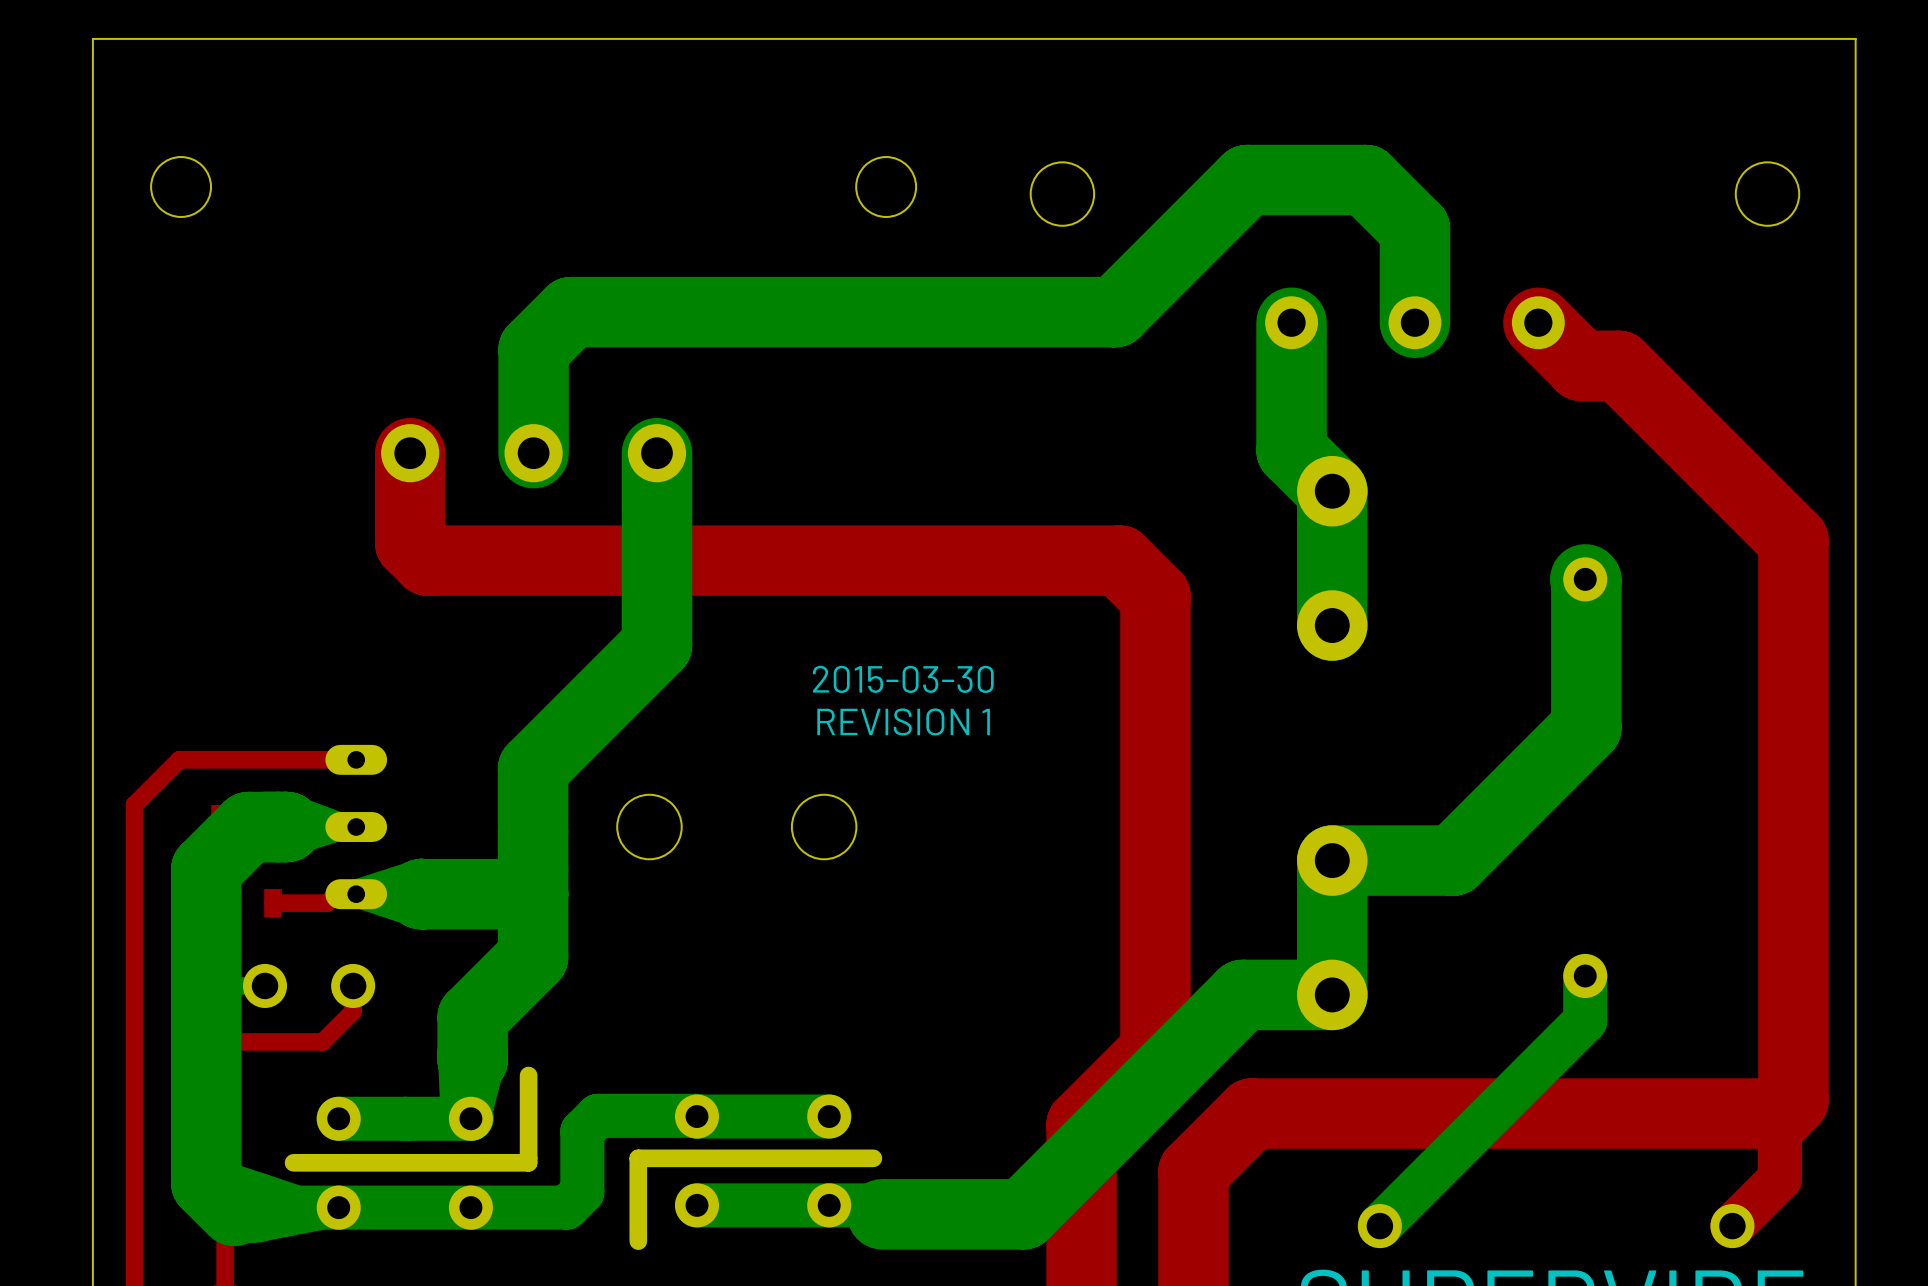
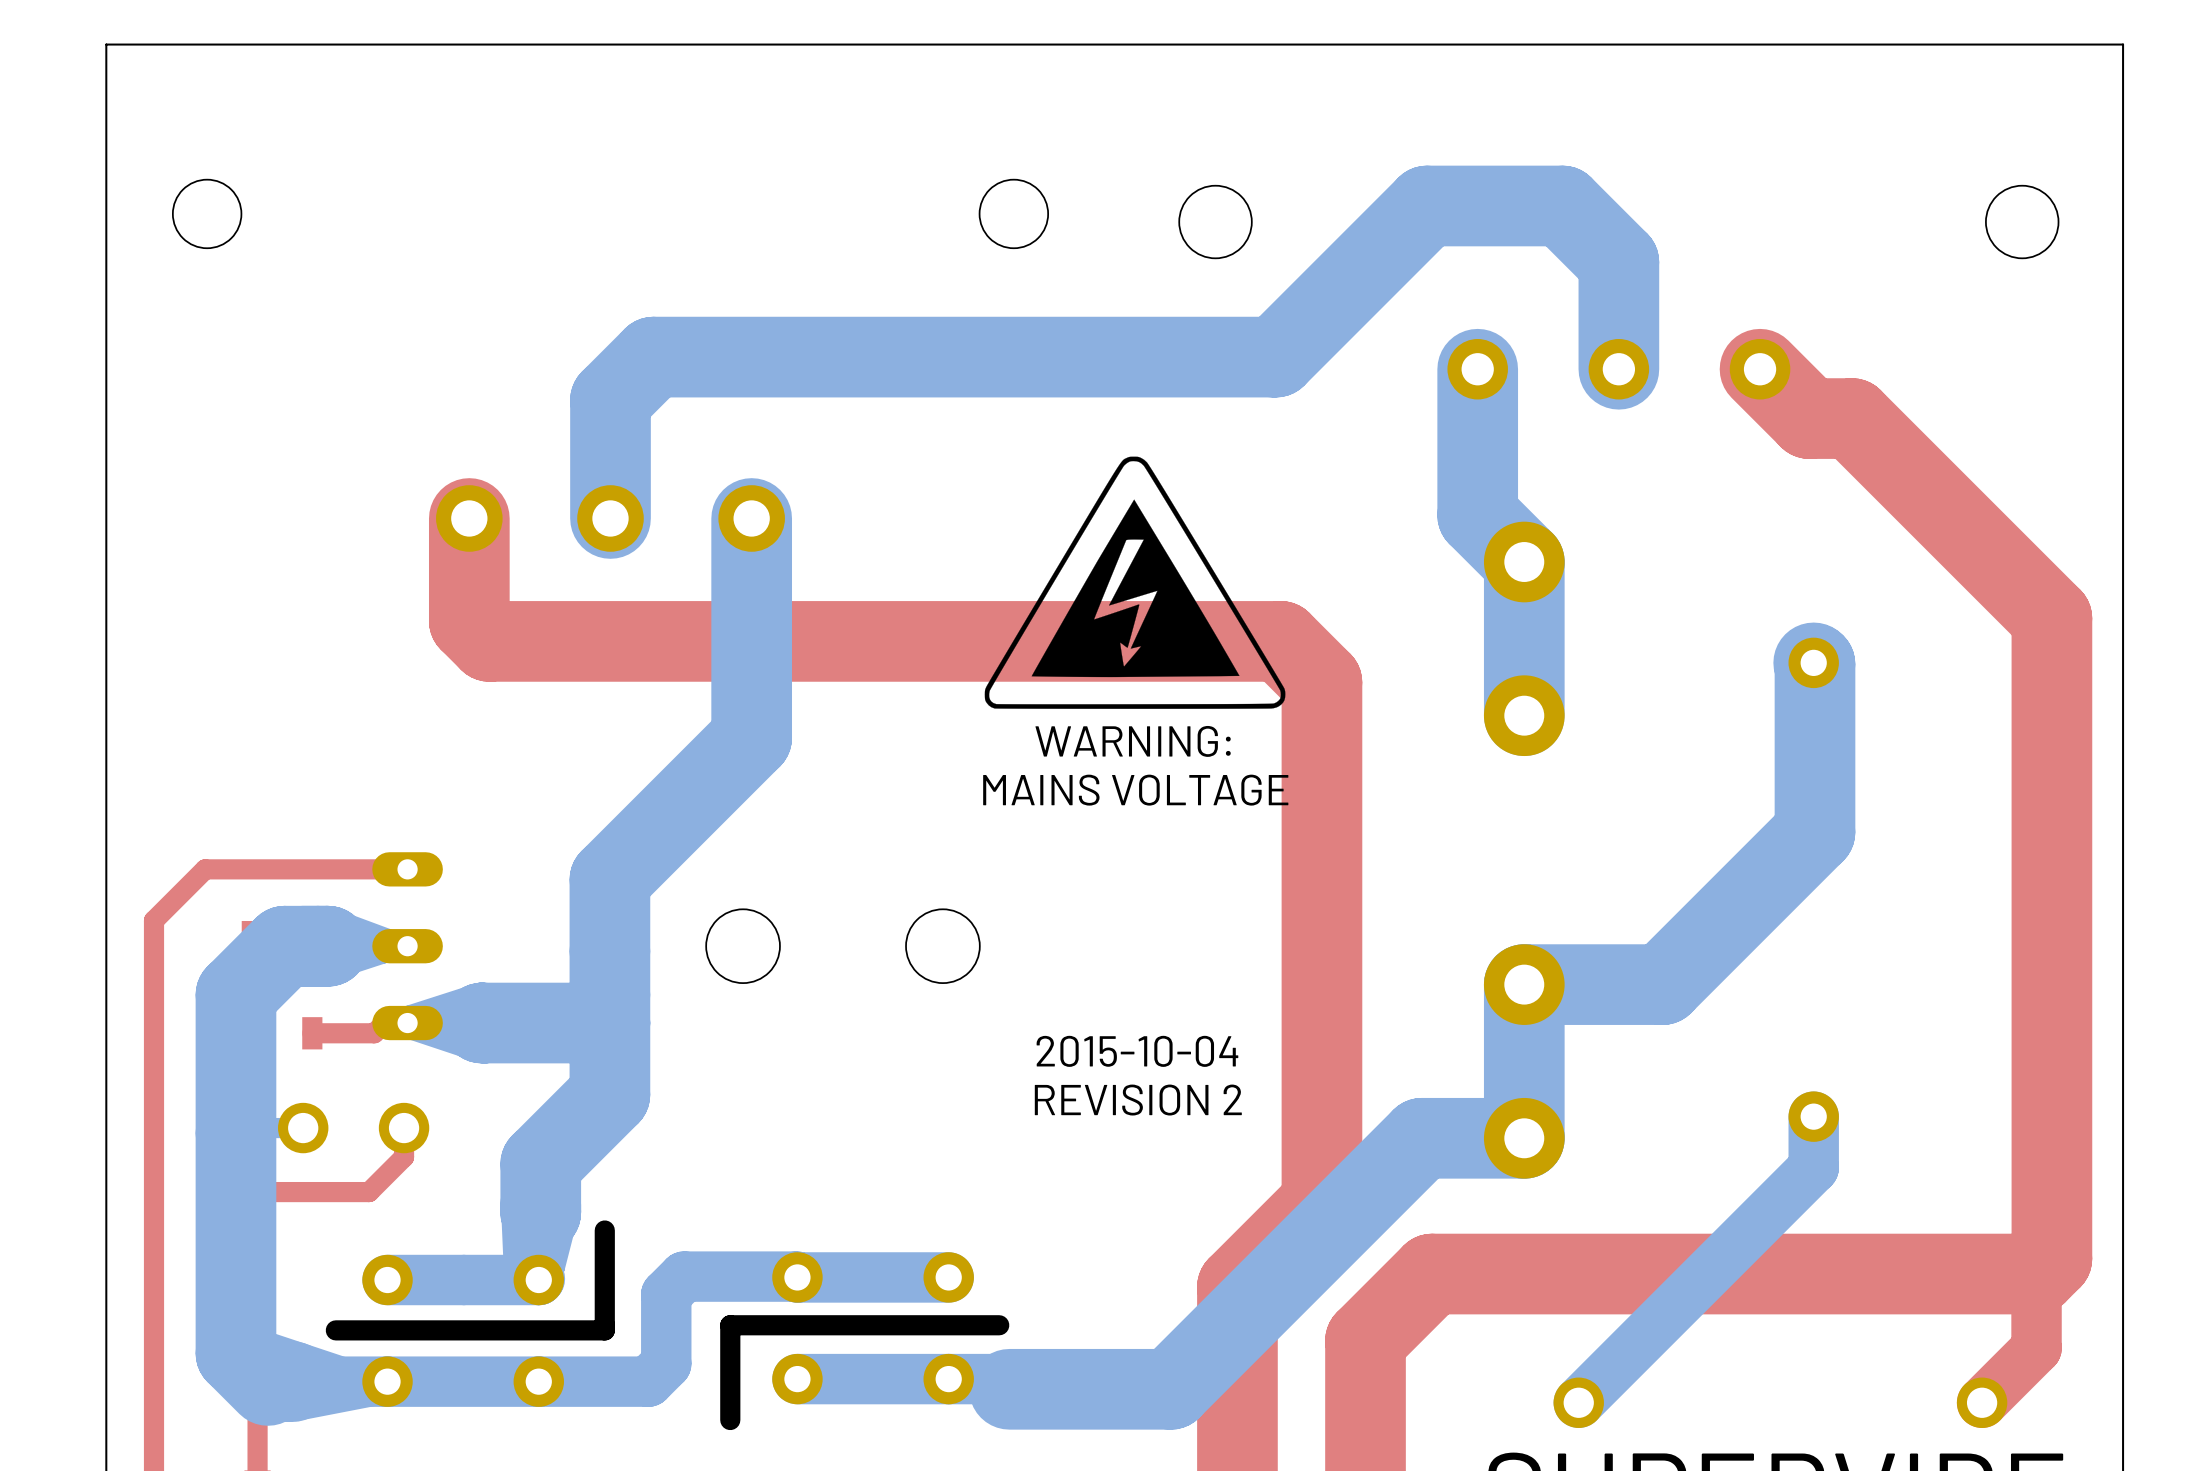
drawing: none -> [984, 456, 1286, 709]
text: none -> WARNING: (1133, 741)
text: 2015-03-30 (903, 679) -> none
text: none -> MAINS VOLTAGE (1135, 790)
text: REVISION 1 (903, 721) -> none
text: none -> 2015-10-04 (1137, 1051)
text: none -> REVISION 2 (1138, 1100)

